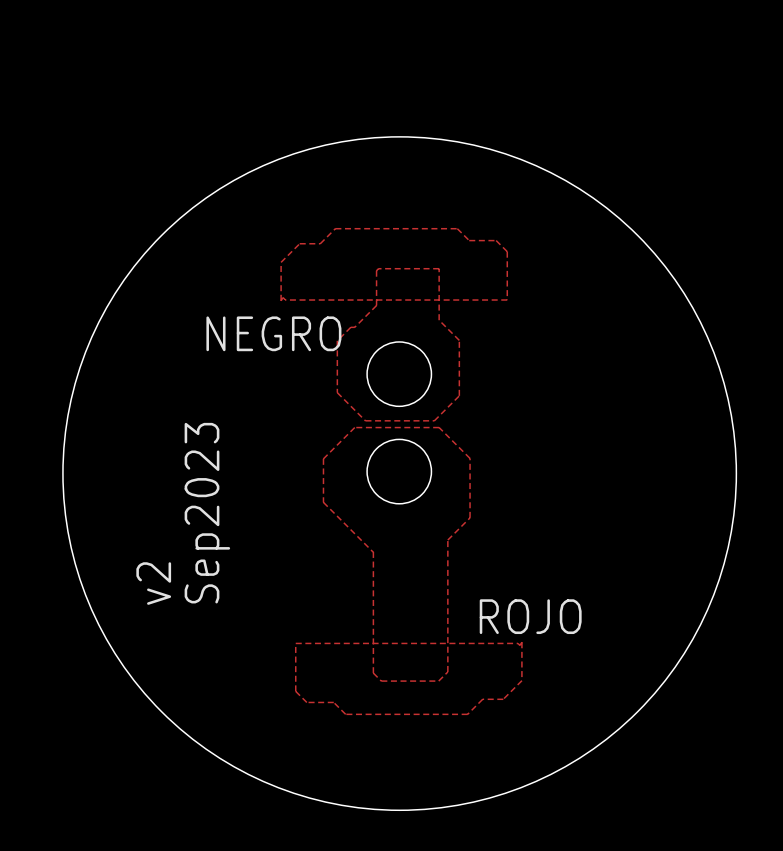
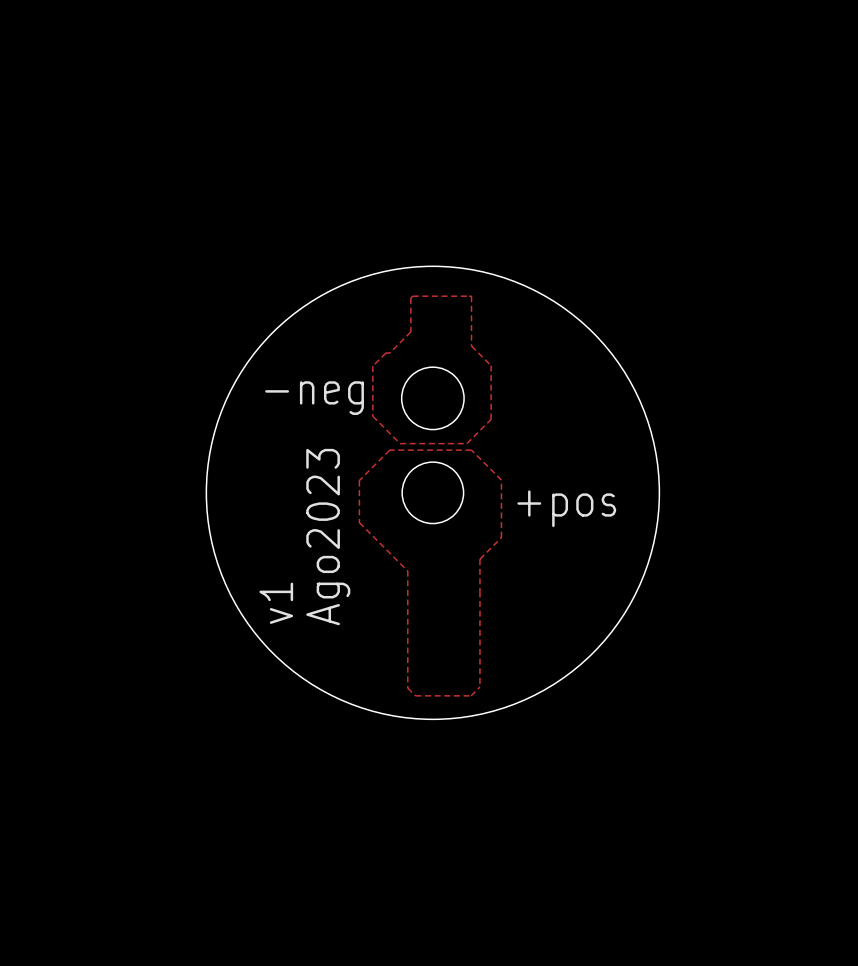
round board edge: [62, 136, 737, 811] -> none
round board edge: none -> [206, 266, 660, 720]
zone outline: (285, 299) (283, 297) (281, 300) (281, 262) (299, 243) (320, 243) (335, 228) (457, 228) (469, 240) (496, 240) (507, 251) (507, 300) (285, 300) -> none
text: NEGRO (273, 333) -> -neg (314, 398)
round board edge: [366, 439, 432, 504] -> none
round board edge: none -> [401, 461, 464, 524]
text: none -> +pos (566, 508)
text: Sep2023 (207, 513) -> v1 (276, 603)
text: none -> Ago2023 (328, 537)
text: v2 (153, 583) -> none
text: ROJO (530, 616) -> none
zone outline: (521, 642) (521, 680) (503, 699) (482, 699) (467, 714) (345, 714) (333, 702) (306, 702) (295, 691) (295, 643) (517, 643) (519, 645) (521, 642) -> none

